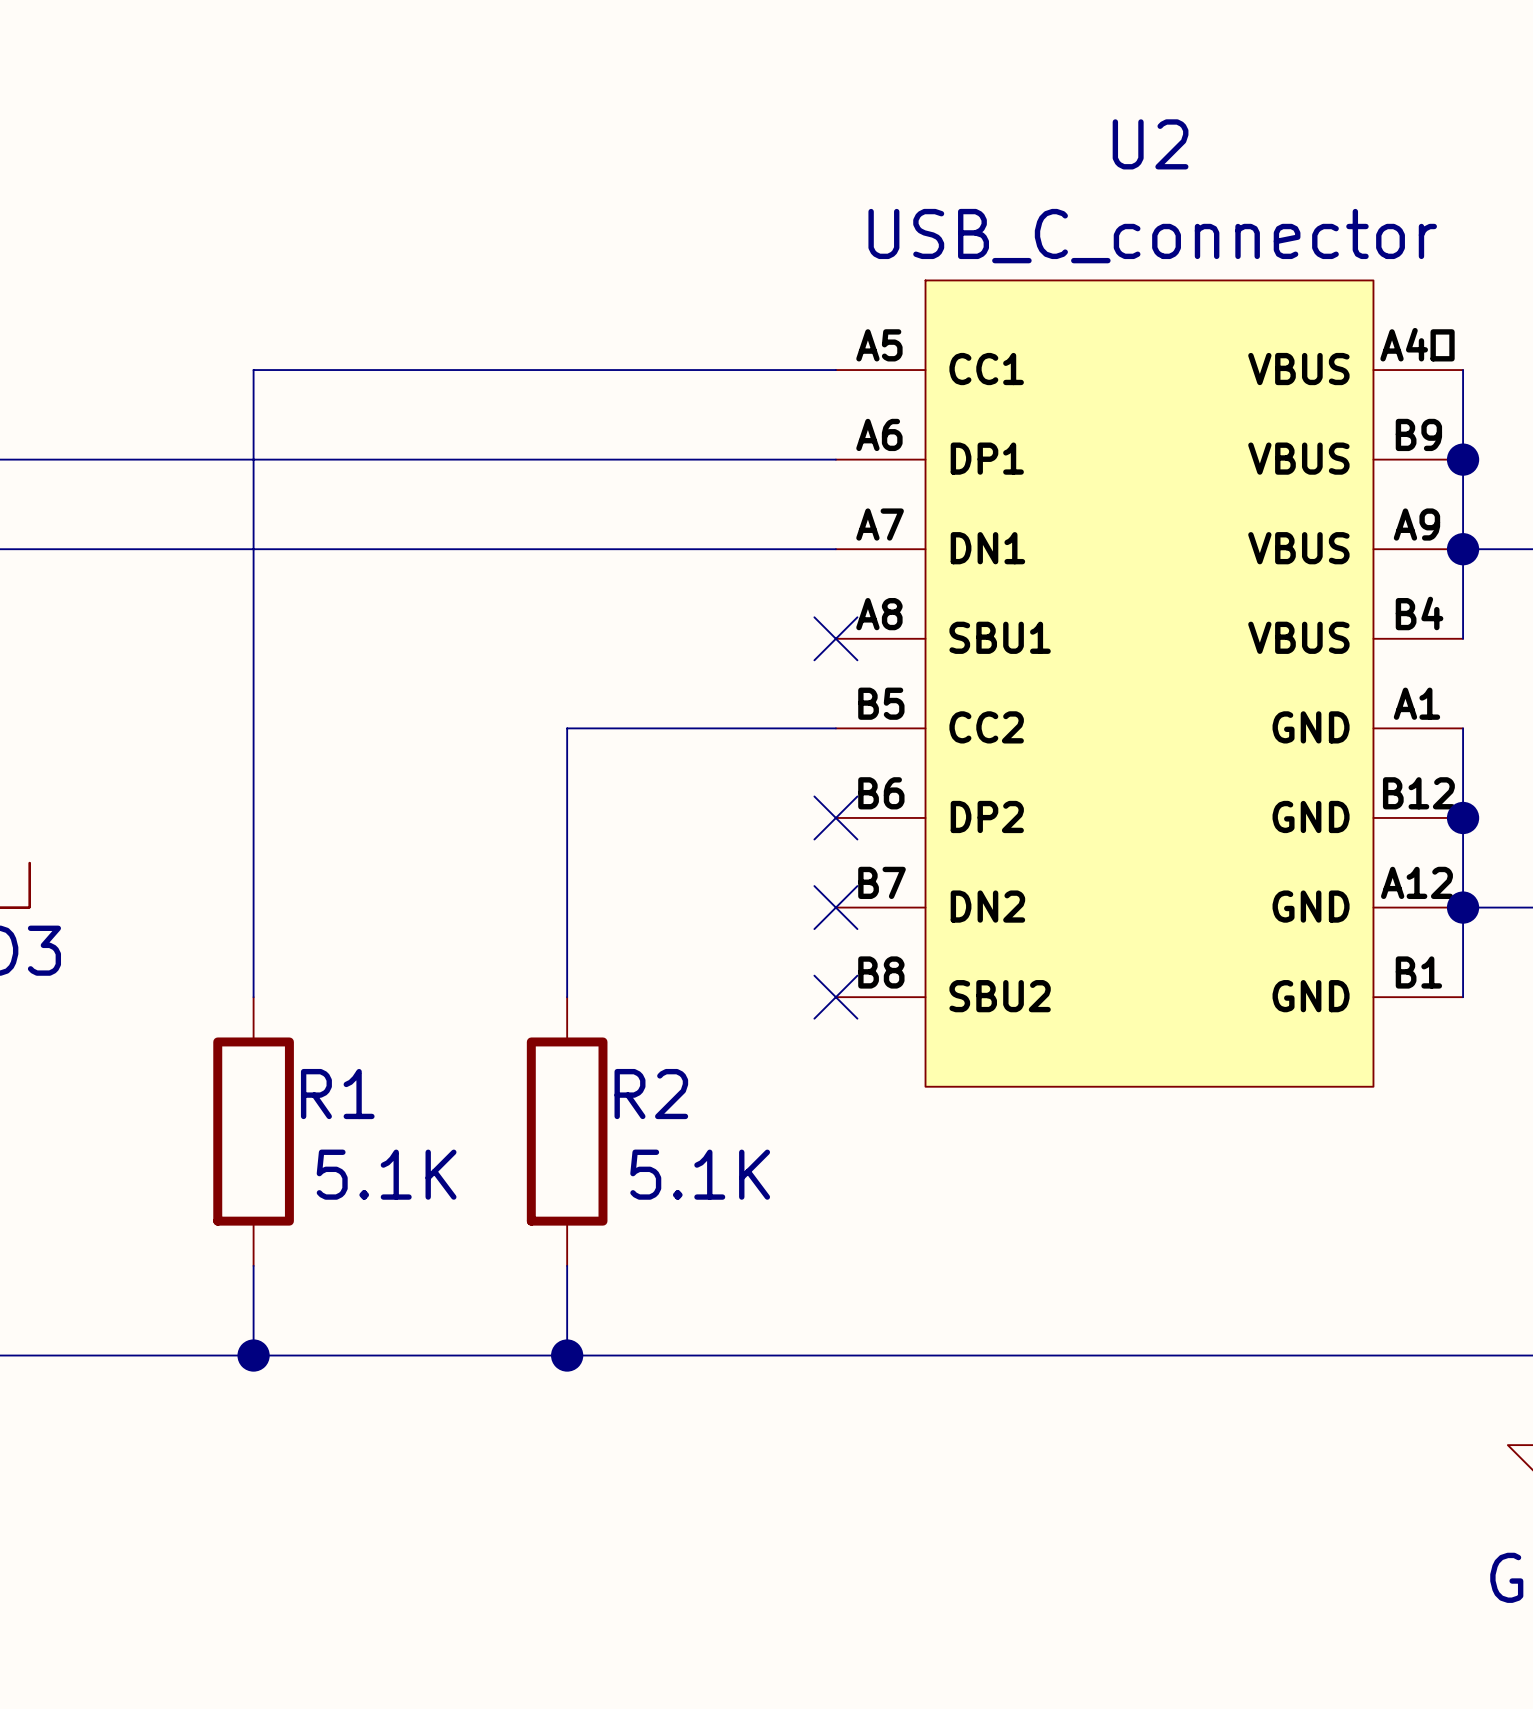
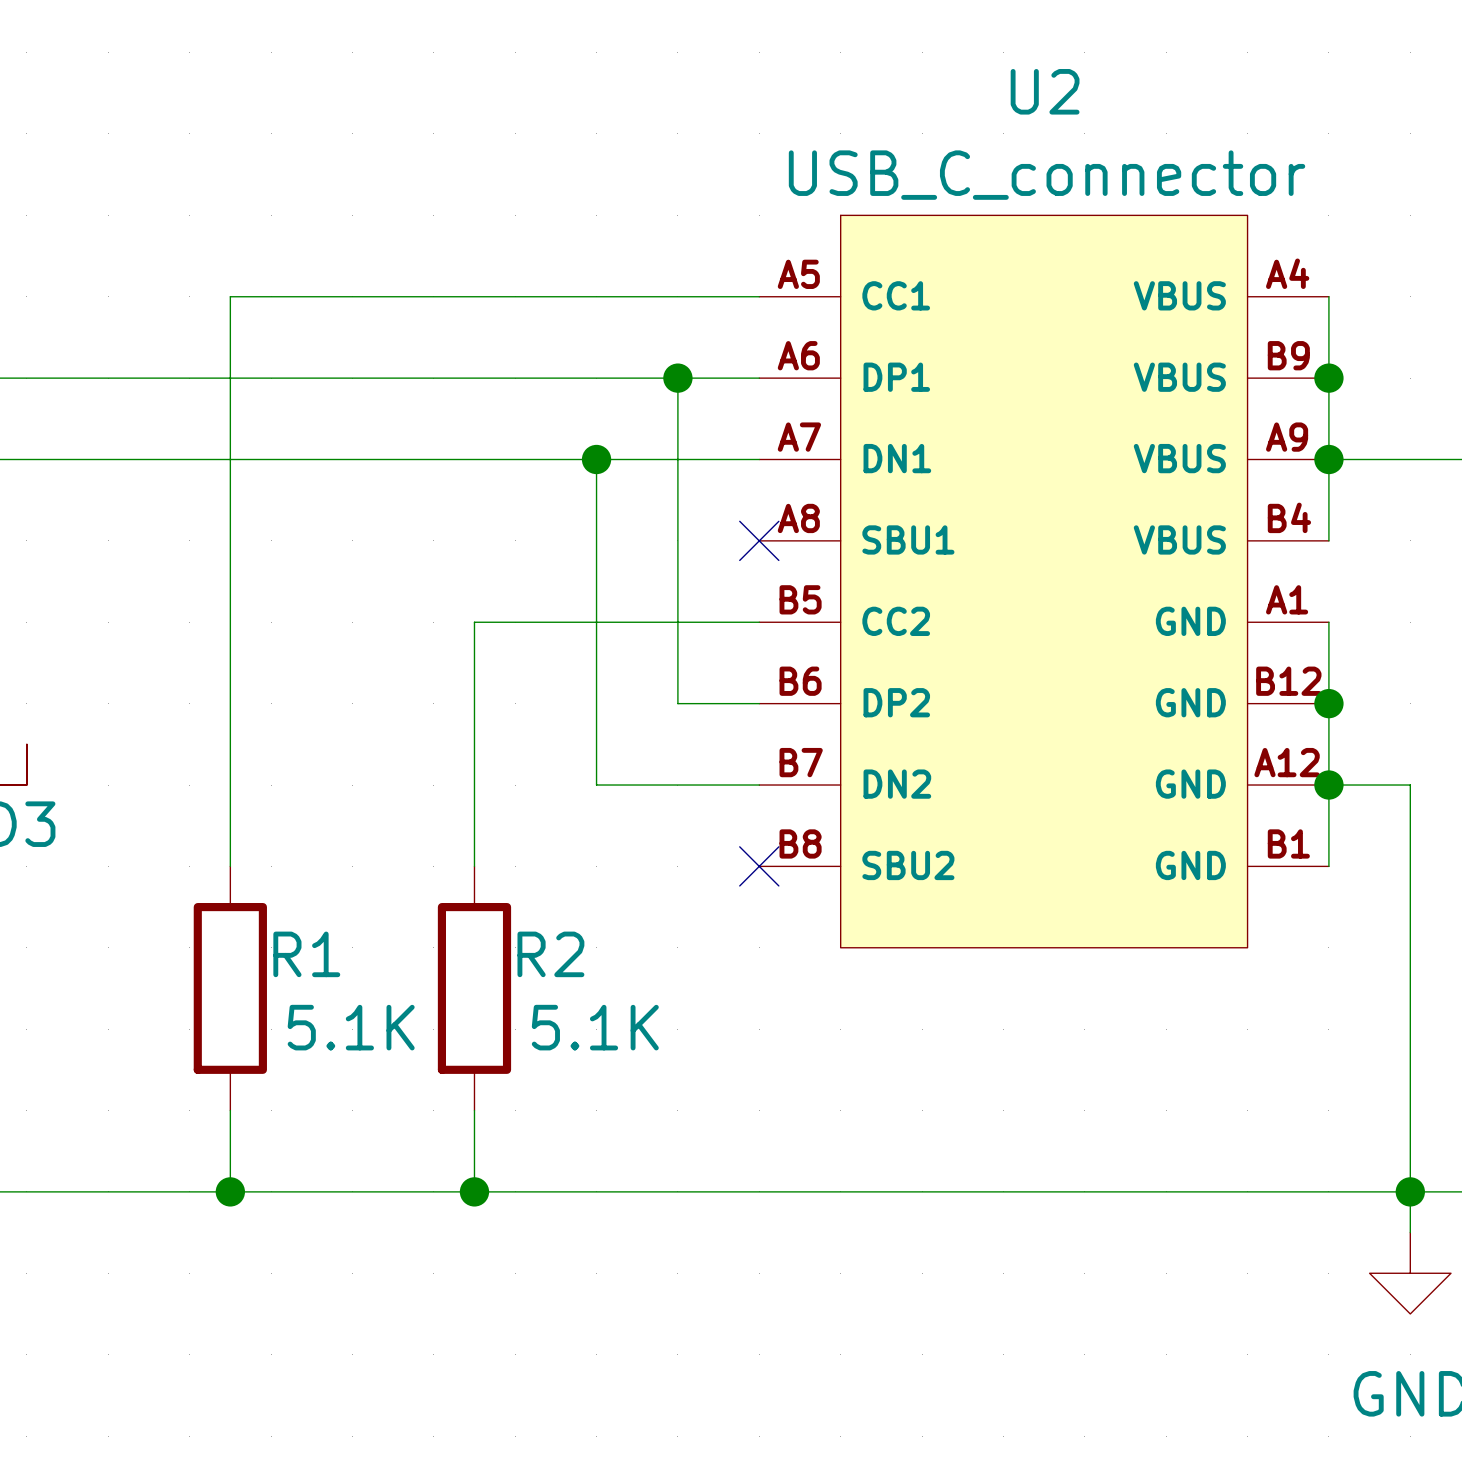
U2 symbol: [835, 280, 1464, 1087] -> [759, 215, 1329, 948]
wire: none -> (677, 378) (677, 703) (759, 703)
junction: none -> (677, 378)
wire: none -> (596, 459) (596, 785) (759, 785)
junction: none -> (596, 459)
wire: (567, 728) (567, 997) -> (515, 622) (474, 622) (474, 866)
no-connect mark: (835, 817) -> none
no-connect mark: (835, 907) -> none
R2 position: (567, 1131) -> (474, 988)
wire: (567, 1265) (567, 1355) -> (474, 1110) (474, 1191)
junction position: (567, 1355) -> (474, 1191)

